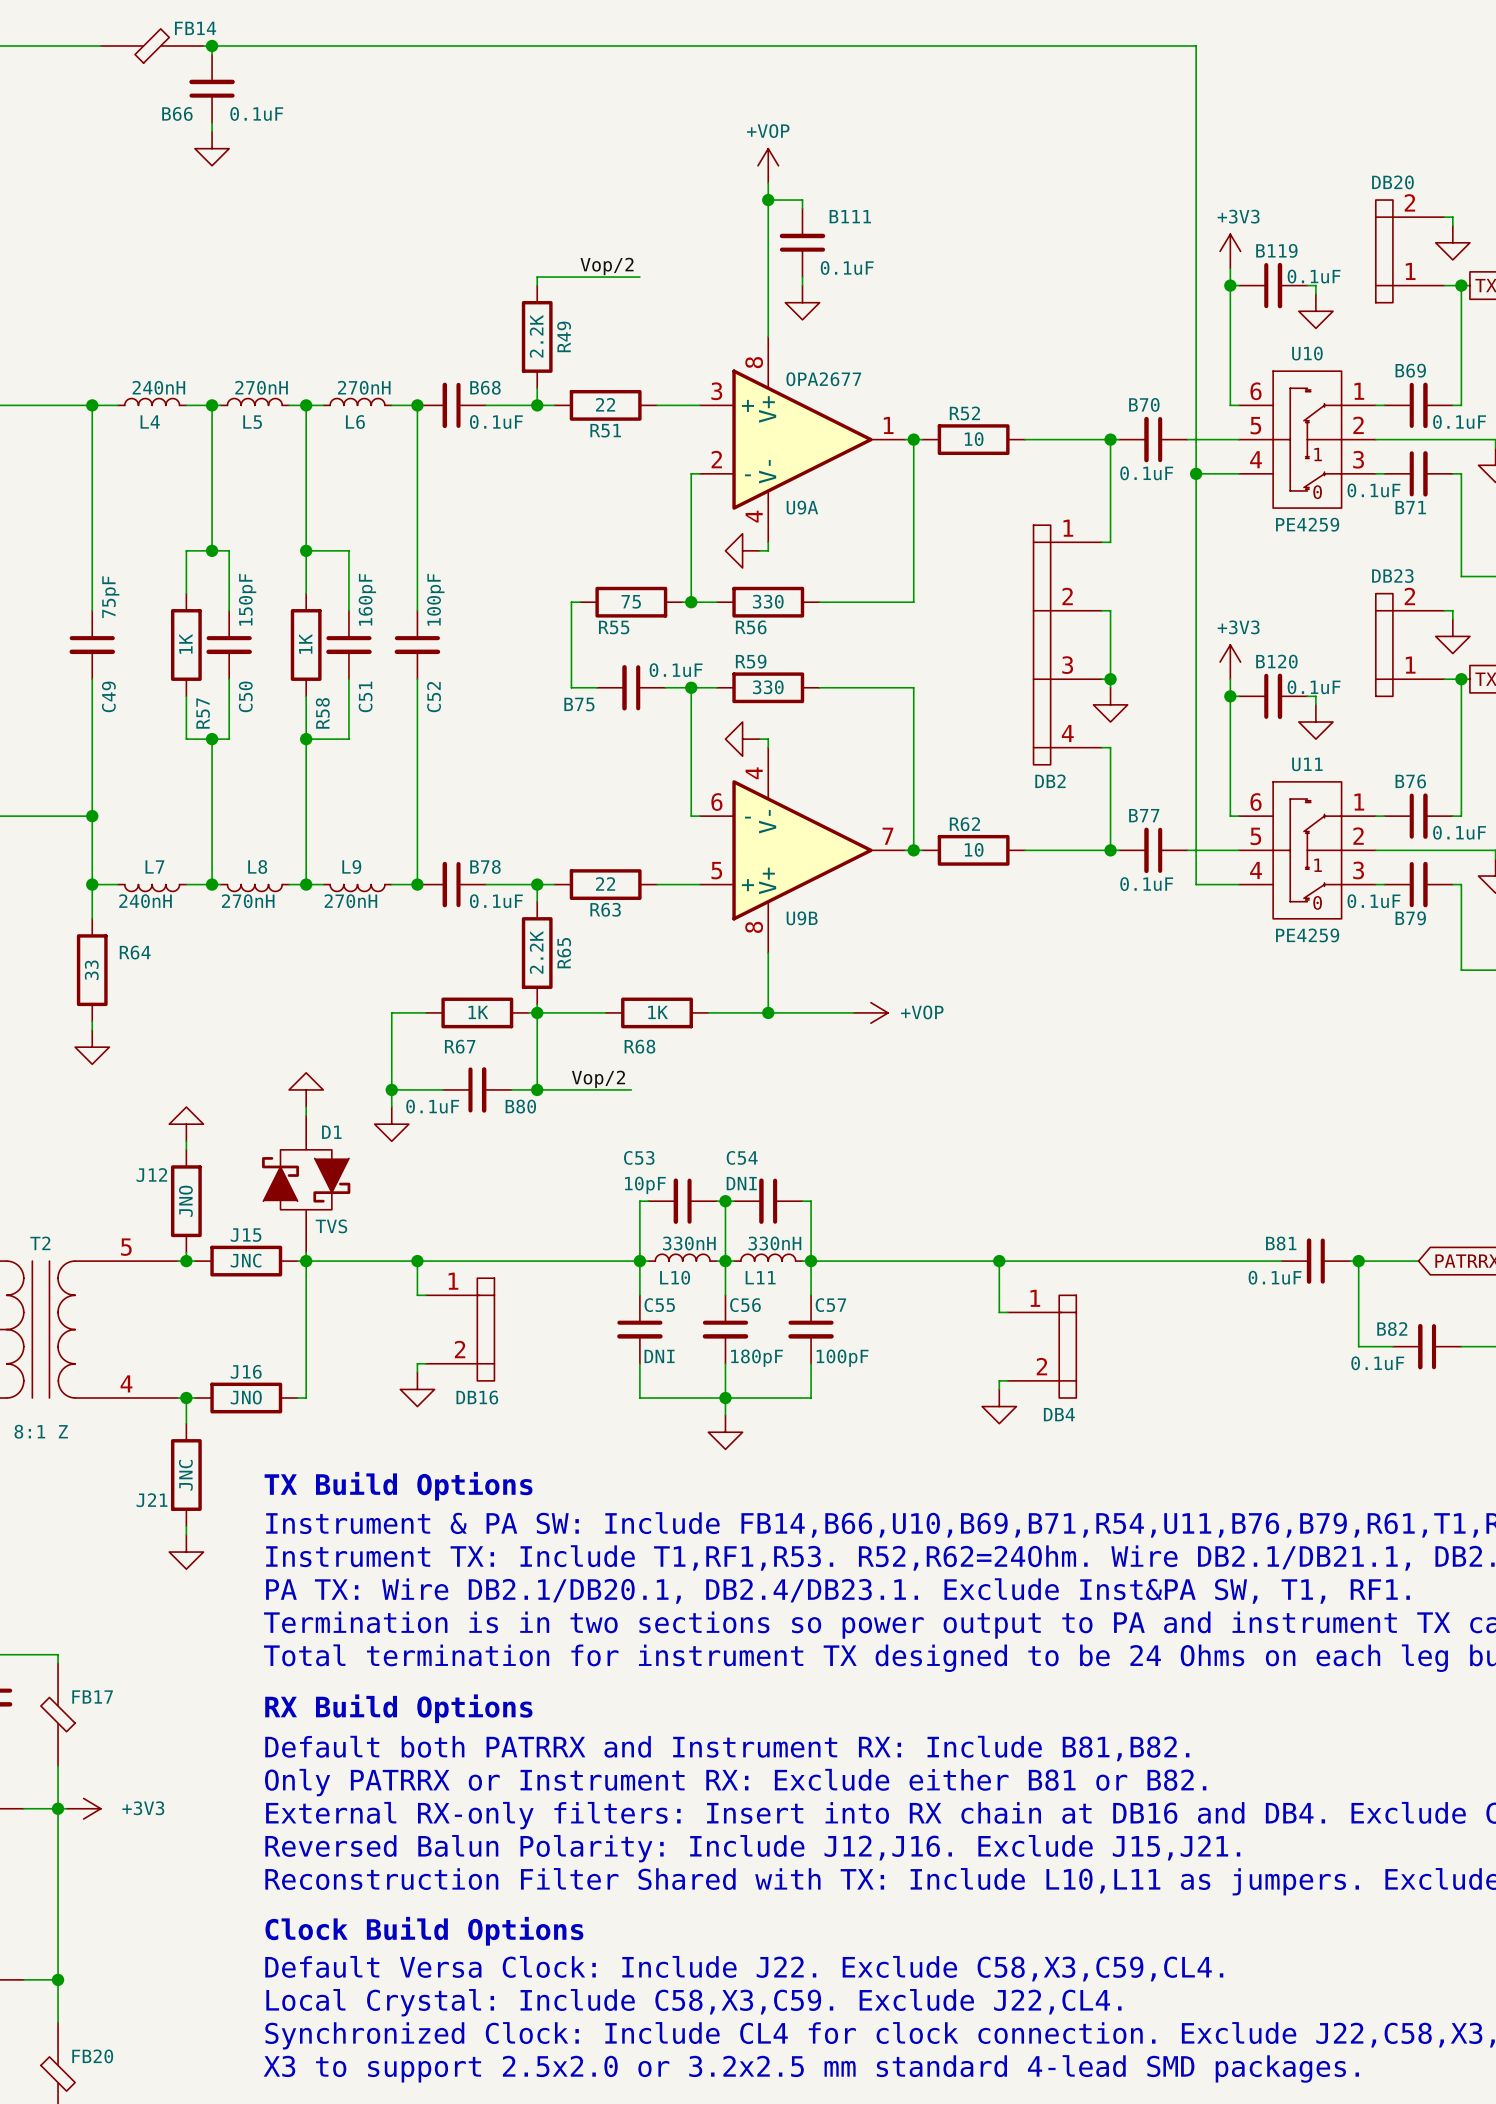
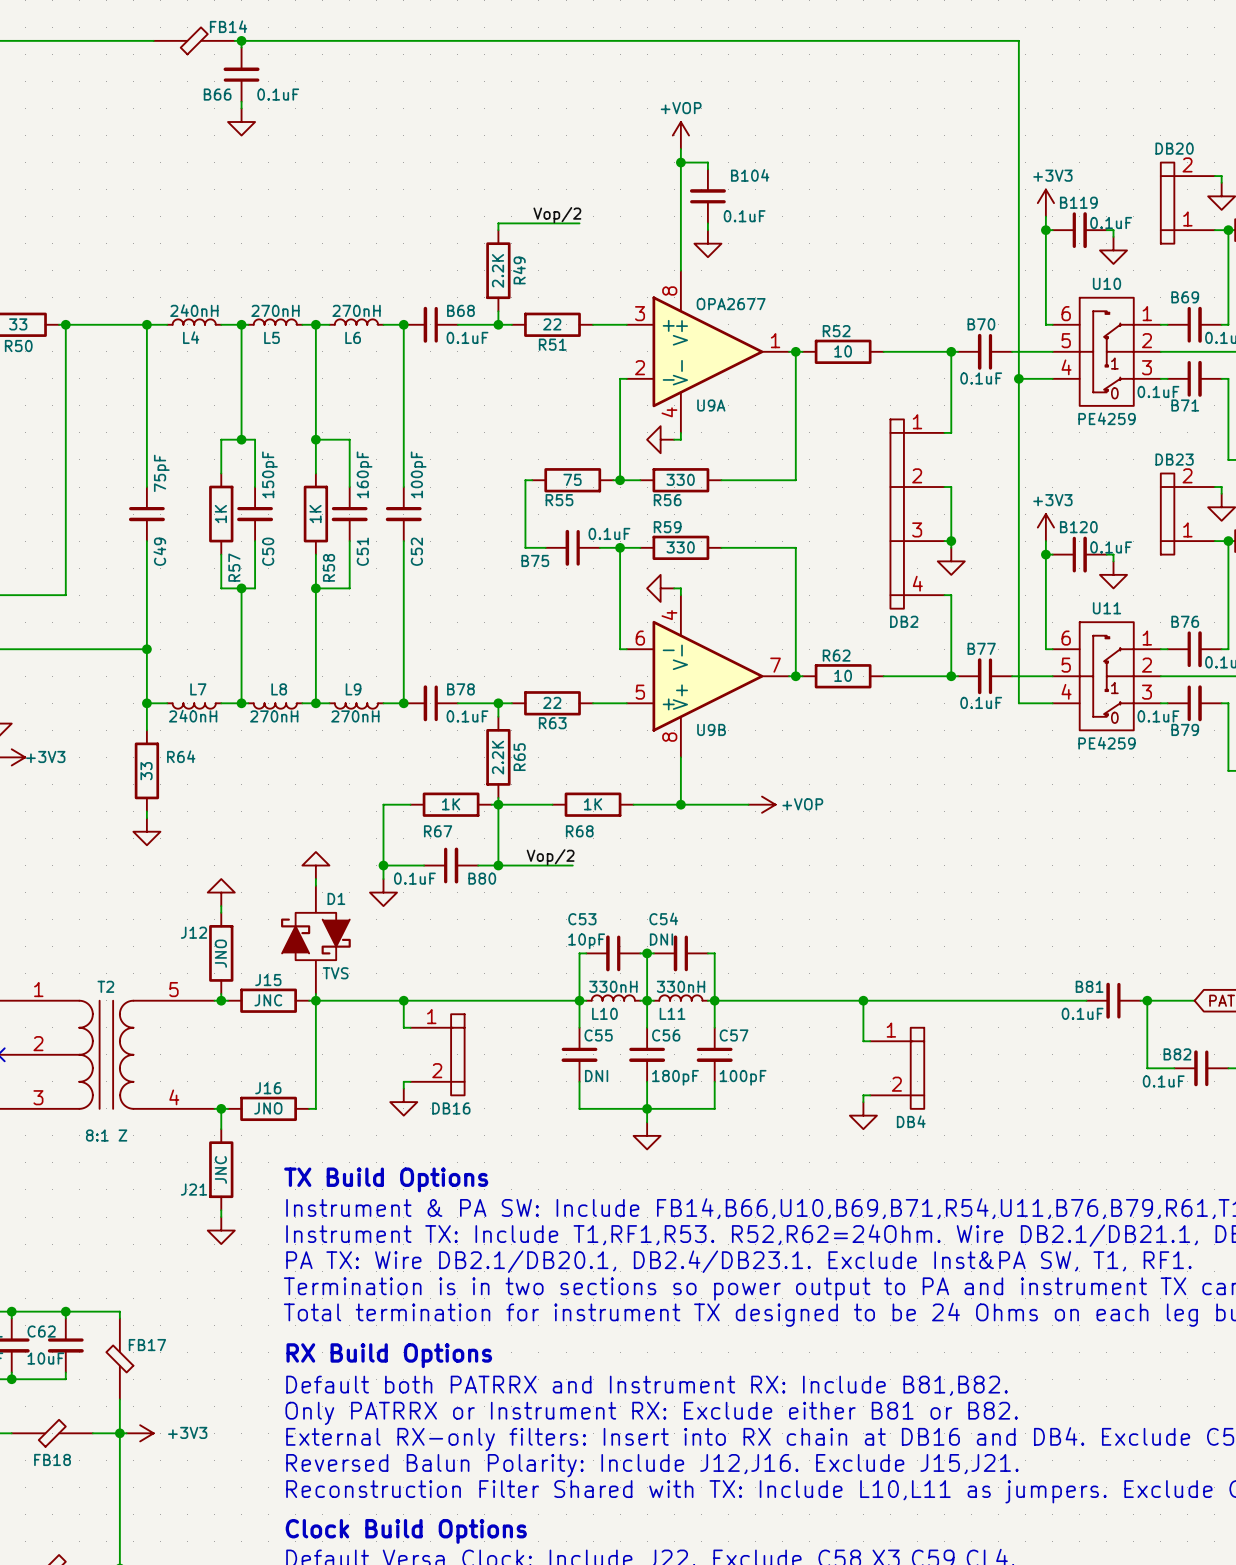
B111 name: B111 (850, 216) -> B104 (750, 175)

